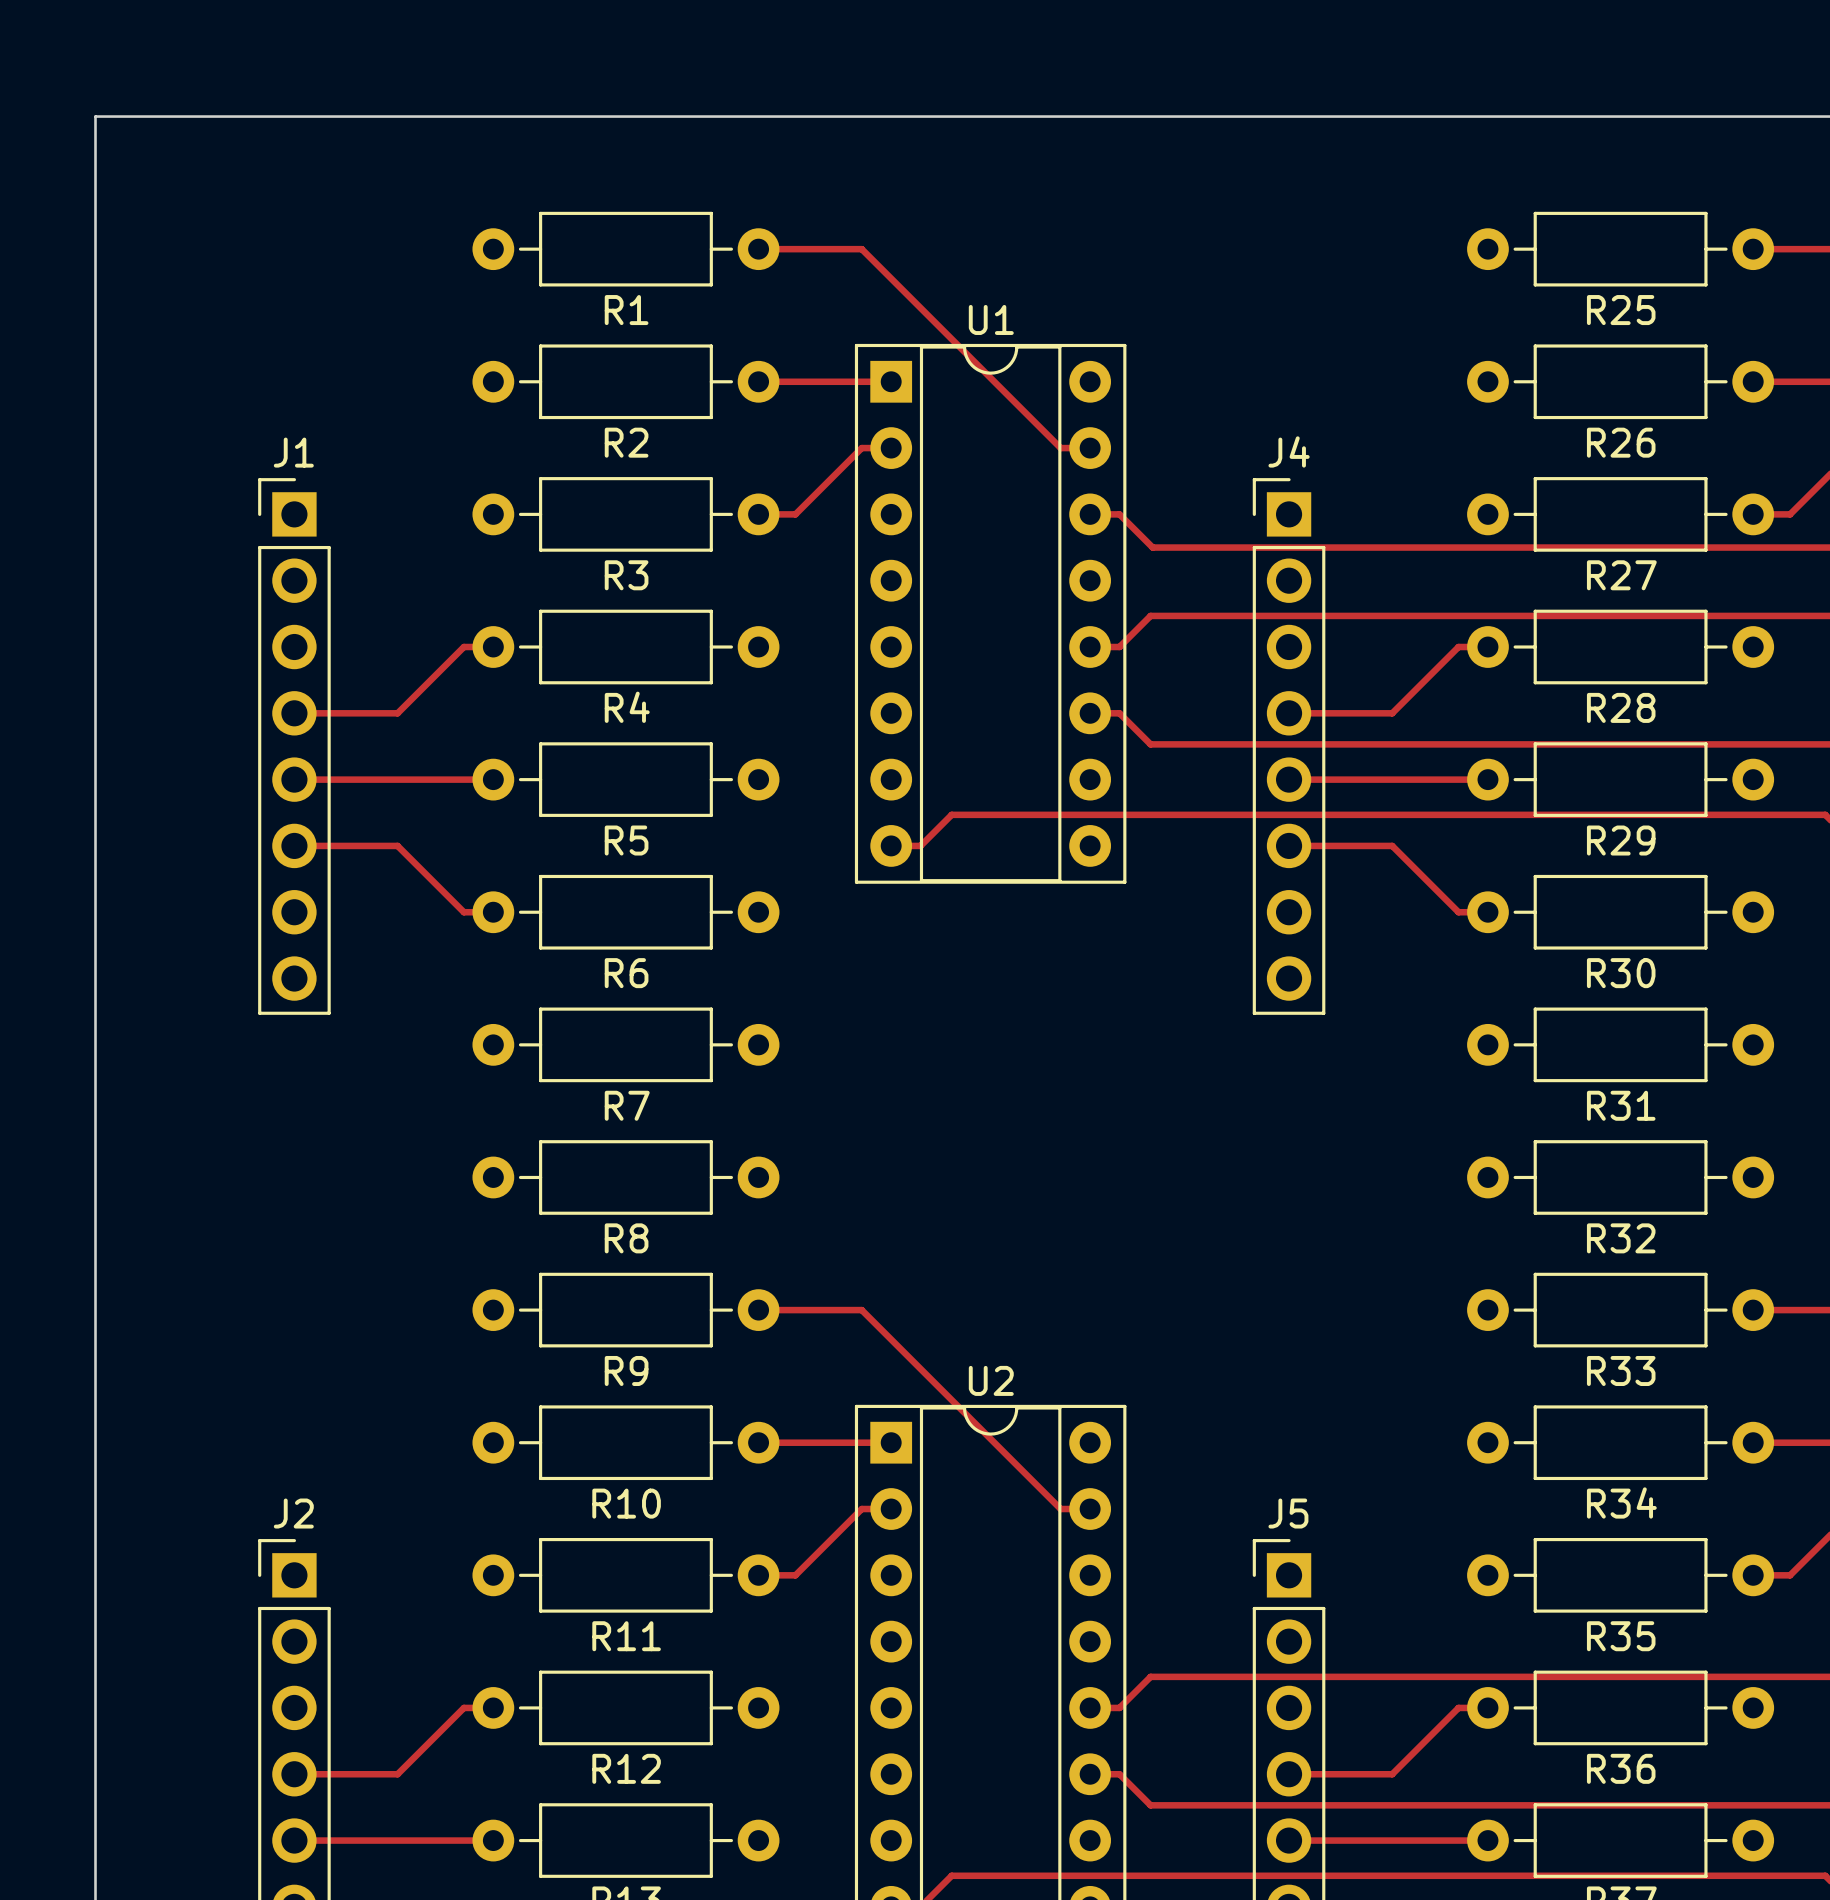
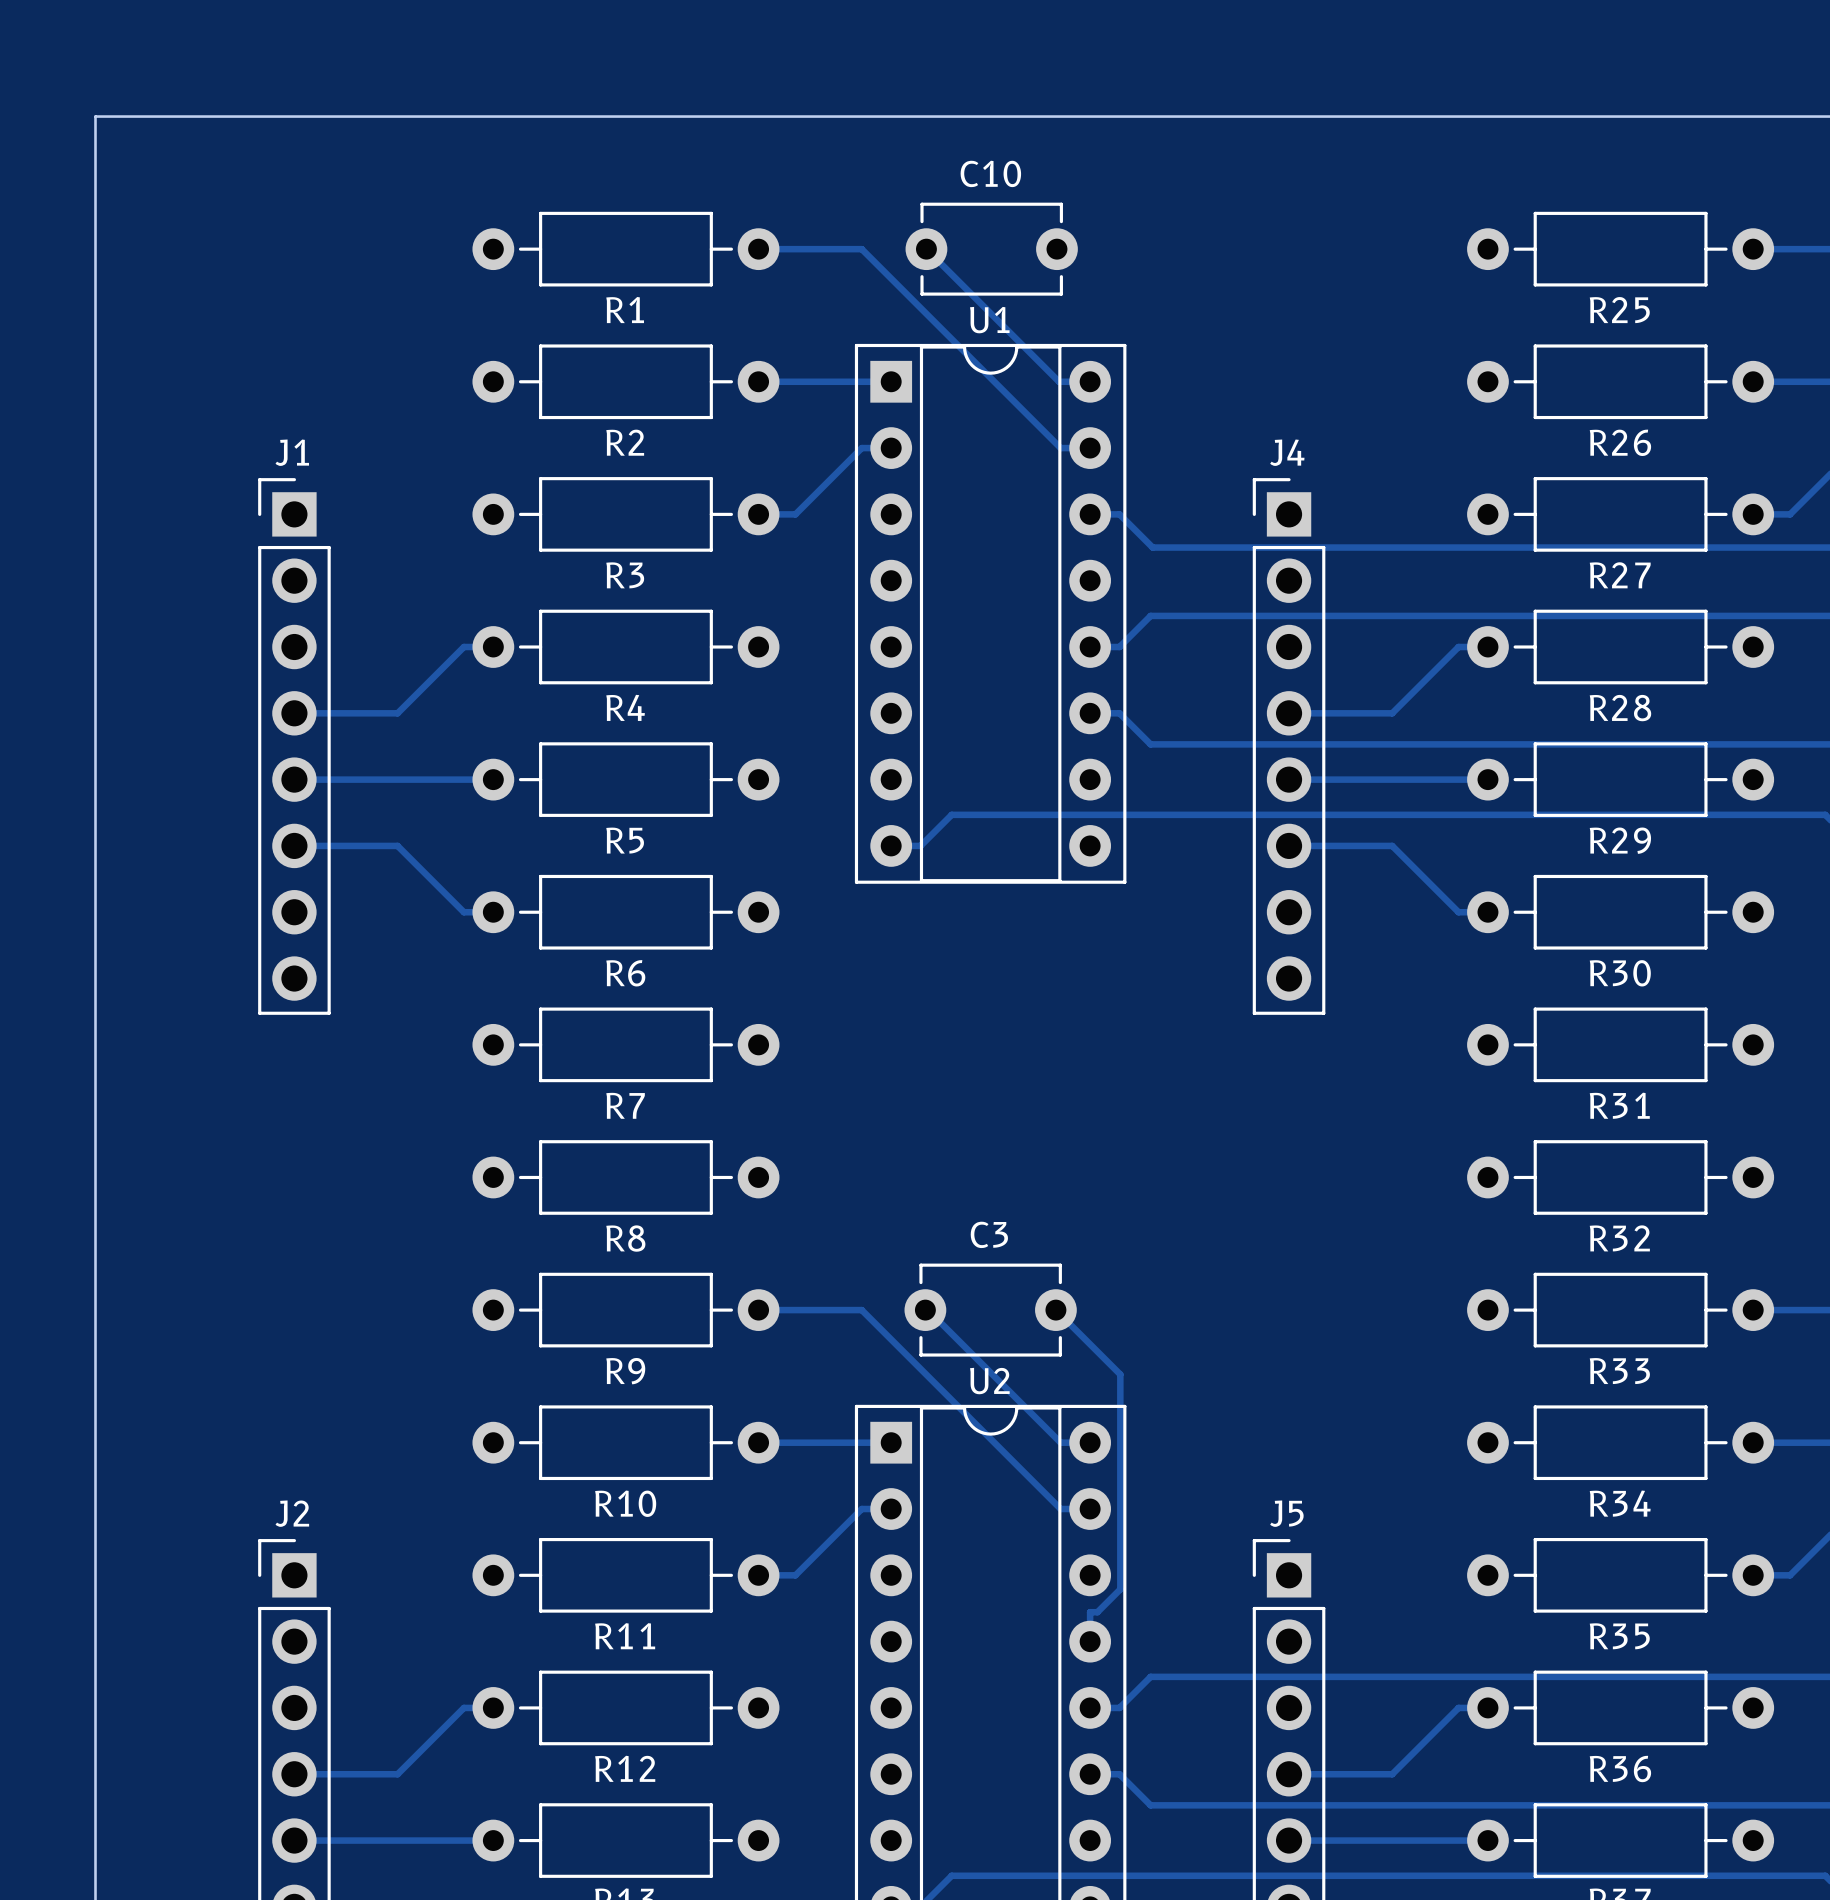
track: none -> (926, 249) (1059, 381) (1090, 381)
C10: none -> (991, 249)
track: none -> (925, 1310) (928, 1310) (1060, 1442) (1090, 1442)
C3: none -> (990, 1310)
track: none -> (1055, 1310) (1120, 1374) (1120, 1589) (1097, 1612) (1090, 1612) (1090, 1641)

